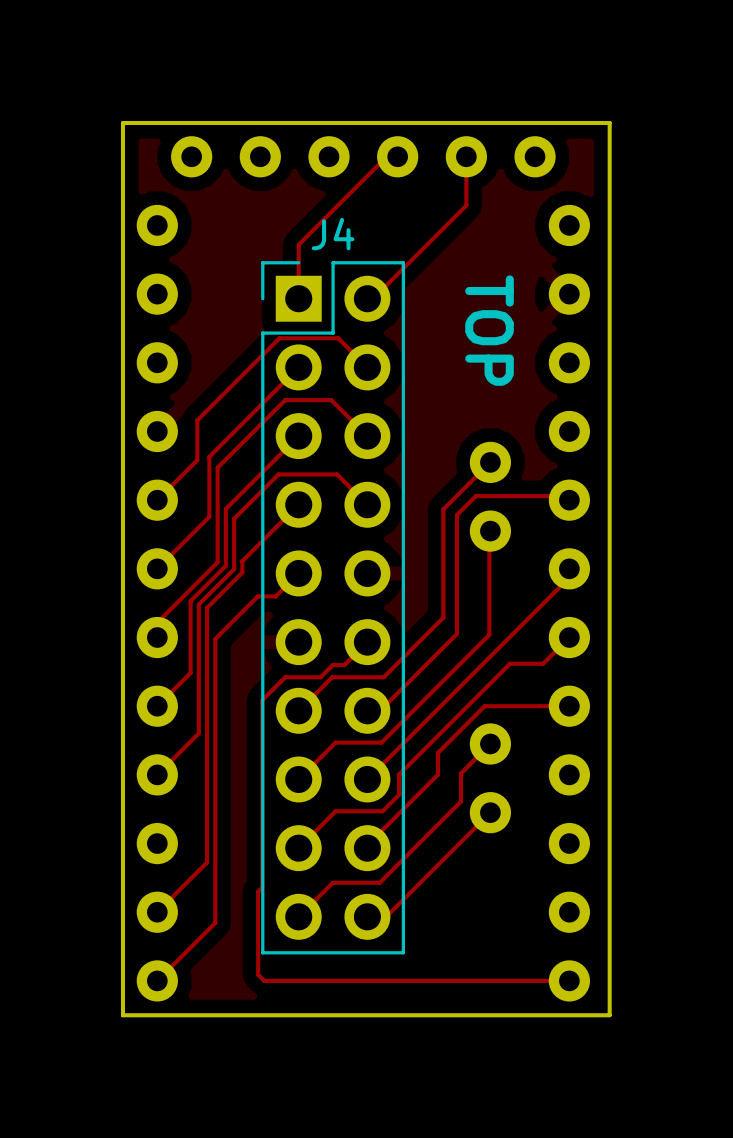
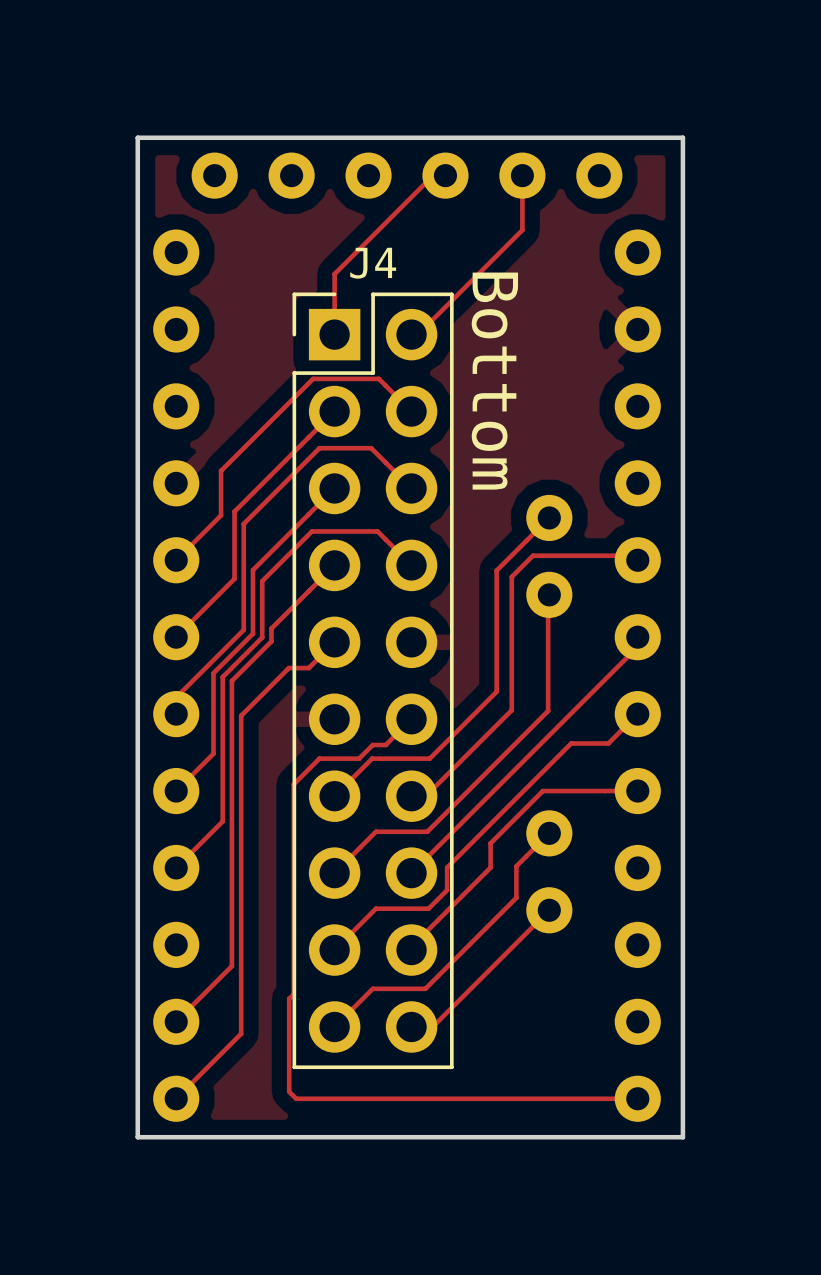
text: TOP (489, 330) -> none
text: none -> Bottom (494, 381)

